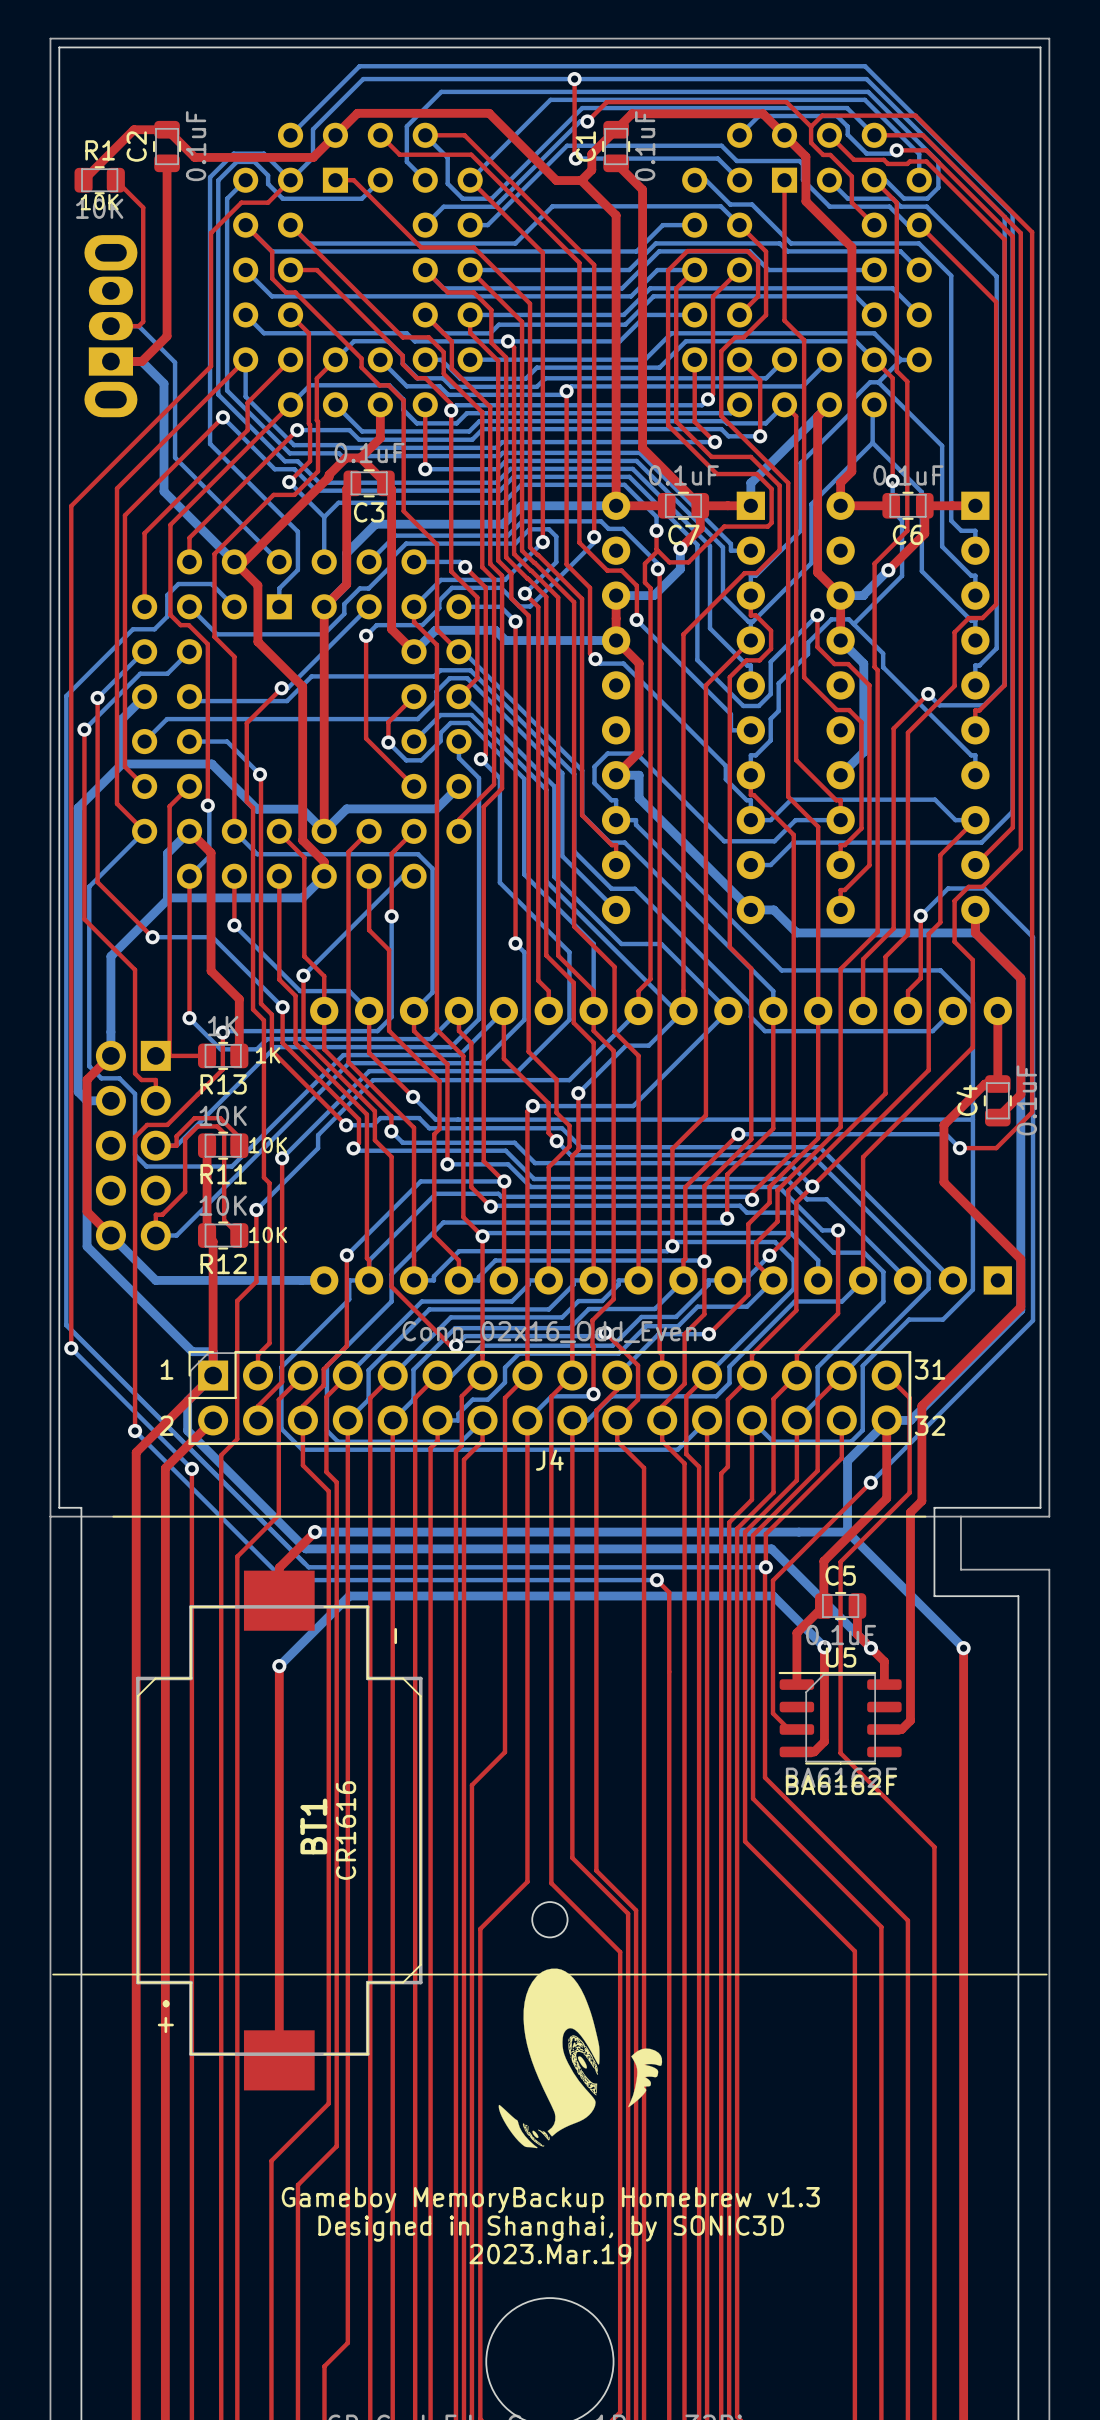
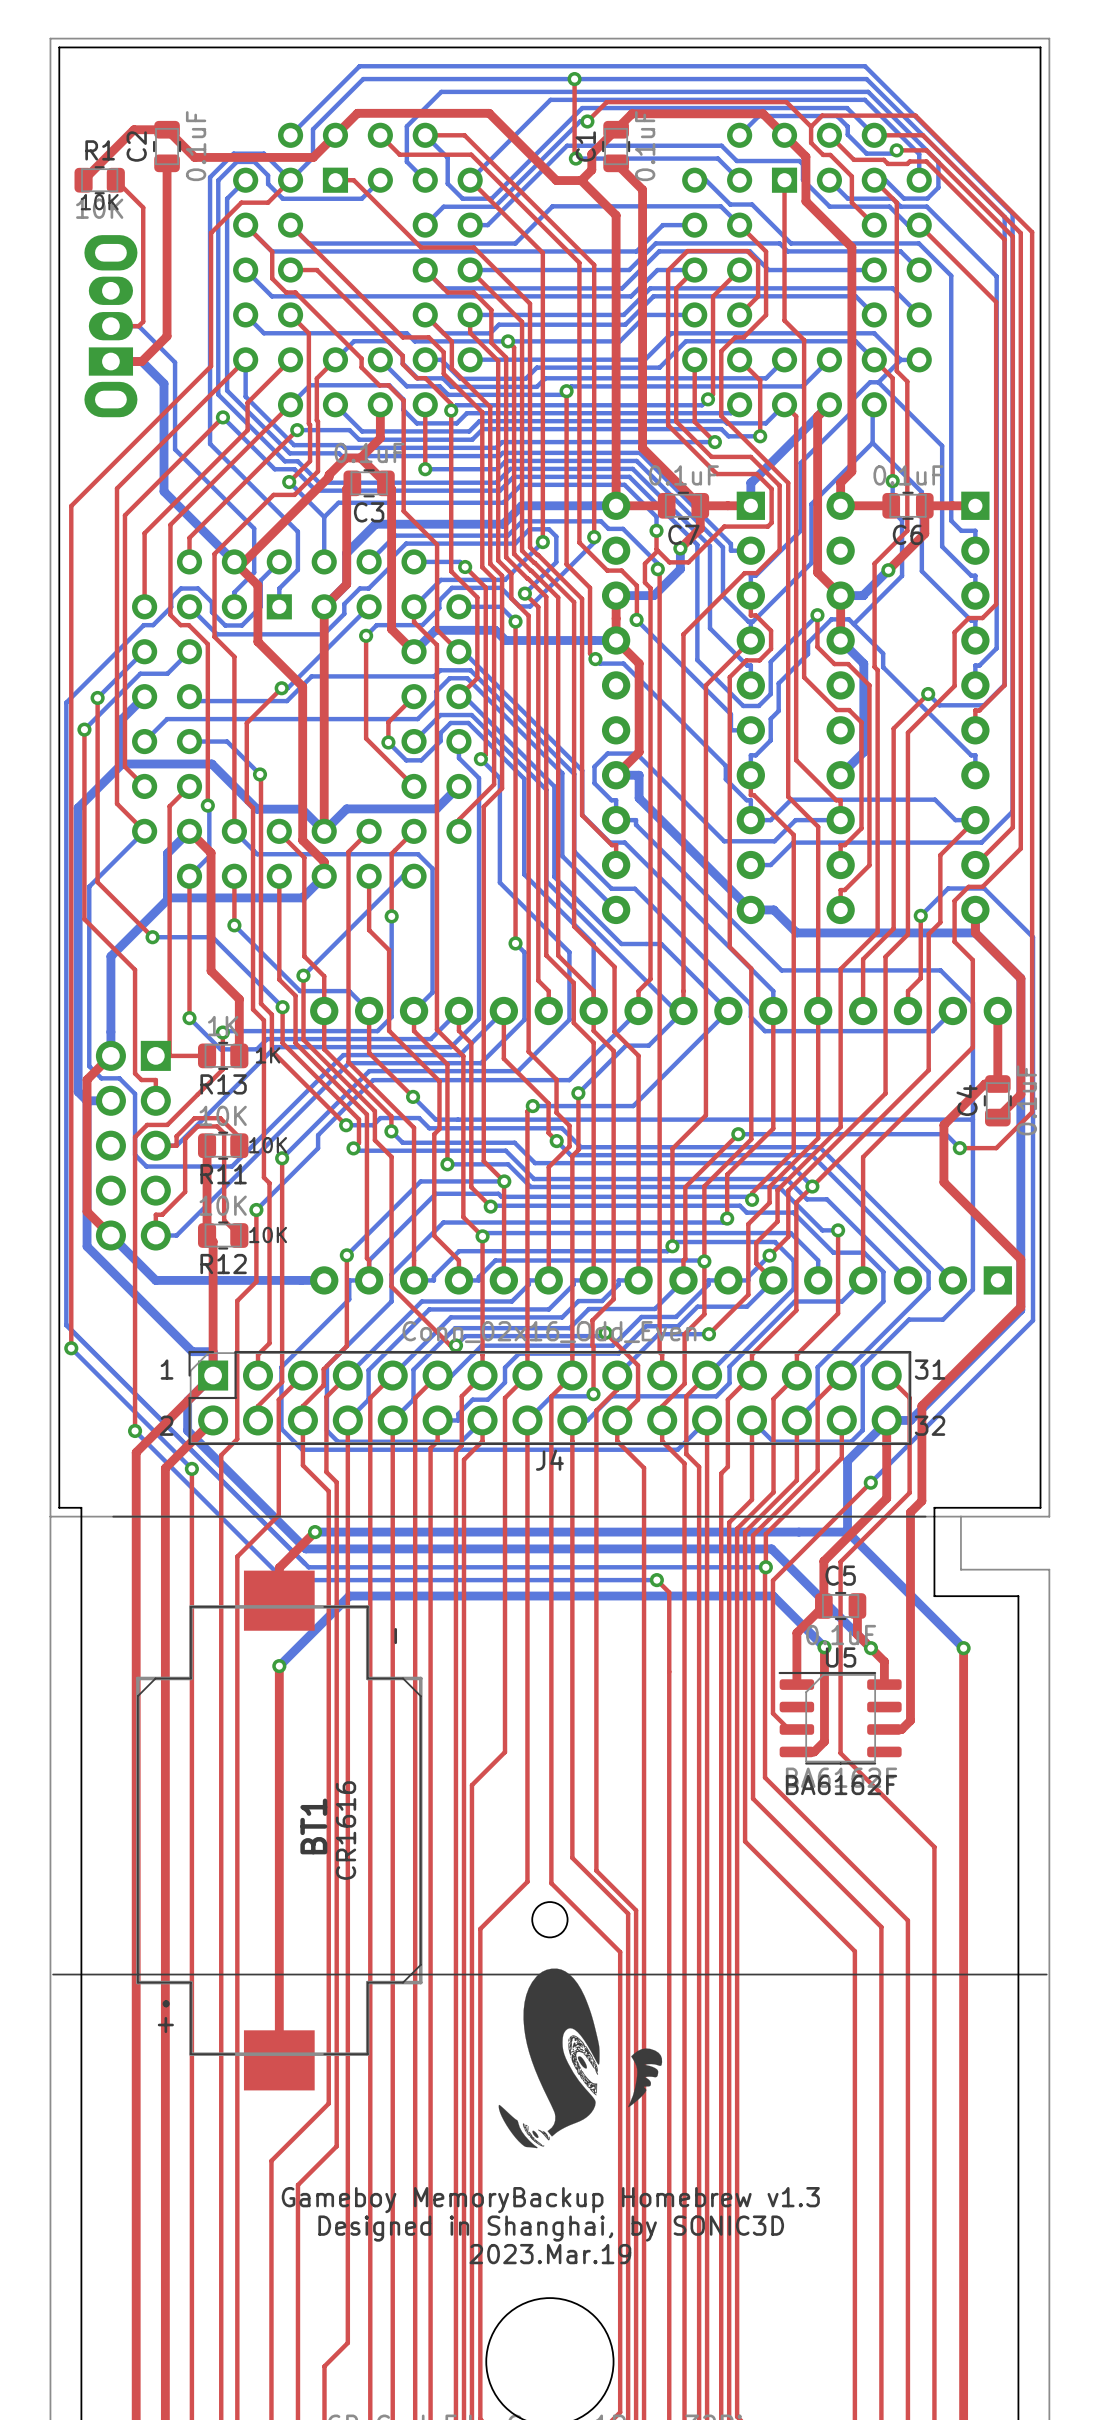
bottom track: (175, 449) (175, 457) (279, 561) -> (175, 449) (254, 528) (254, 572) (234, 592) (234, 606)
bottom track: (234, 606) (211, 584) (178, 584) (167, 595) (167, 616) (154, 629) (133, 629) (66, 695) (66, 702) -> (279, 561) (260, 580) (260, 606) (242, 625) (225, 625) (211, 612) (211, 602) (198, 588) (180, 588) (171, 598) (171, 607) (153, 625) (143, 625) (66, 702)

